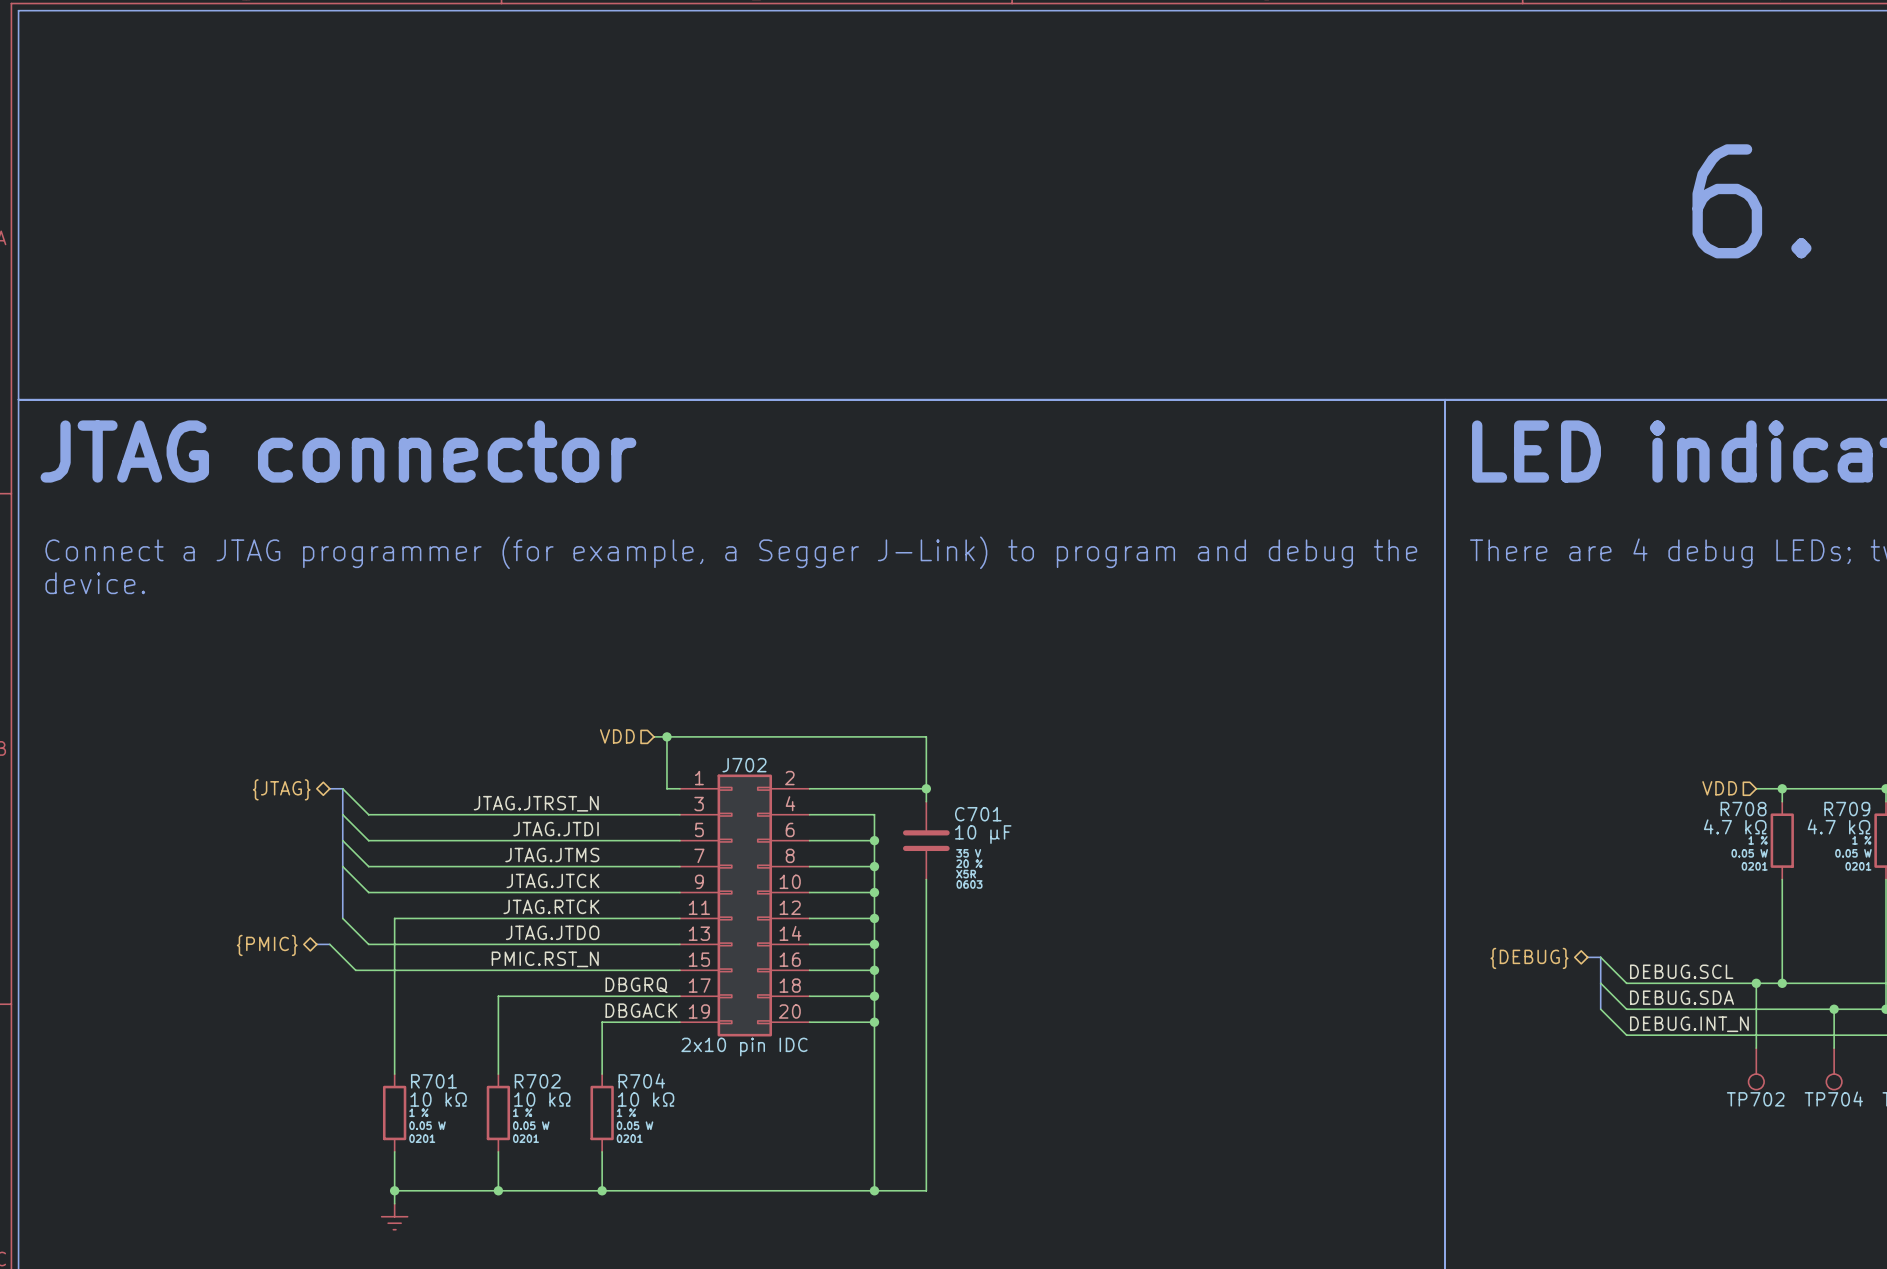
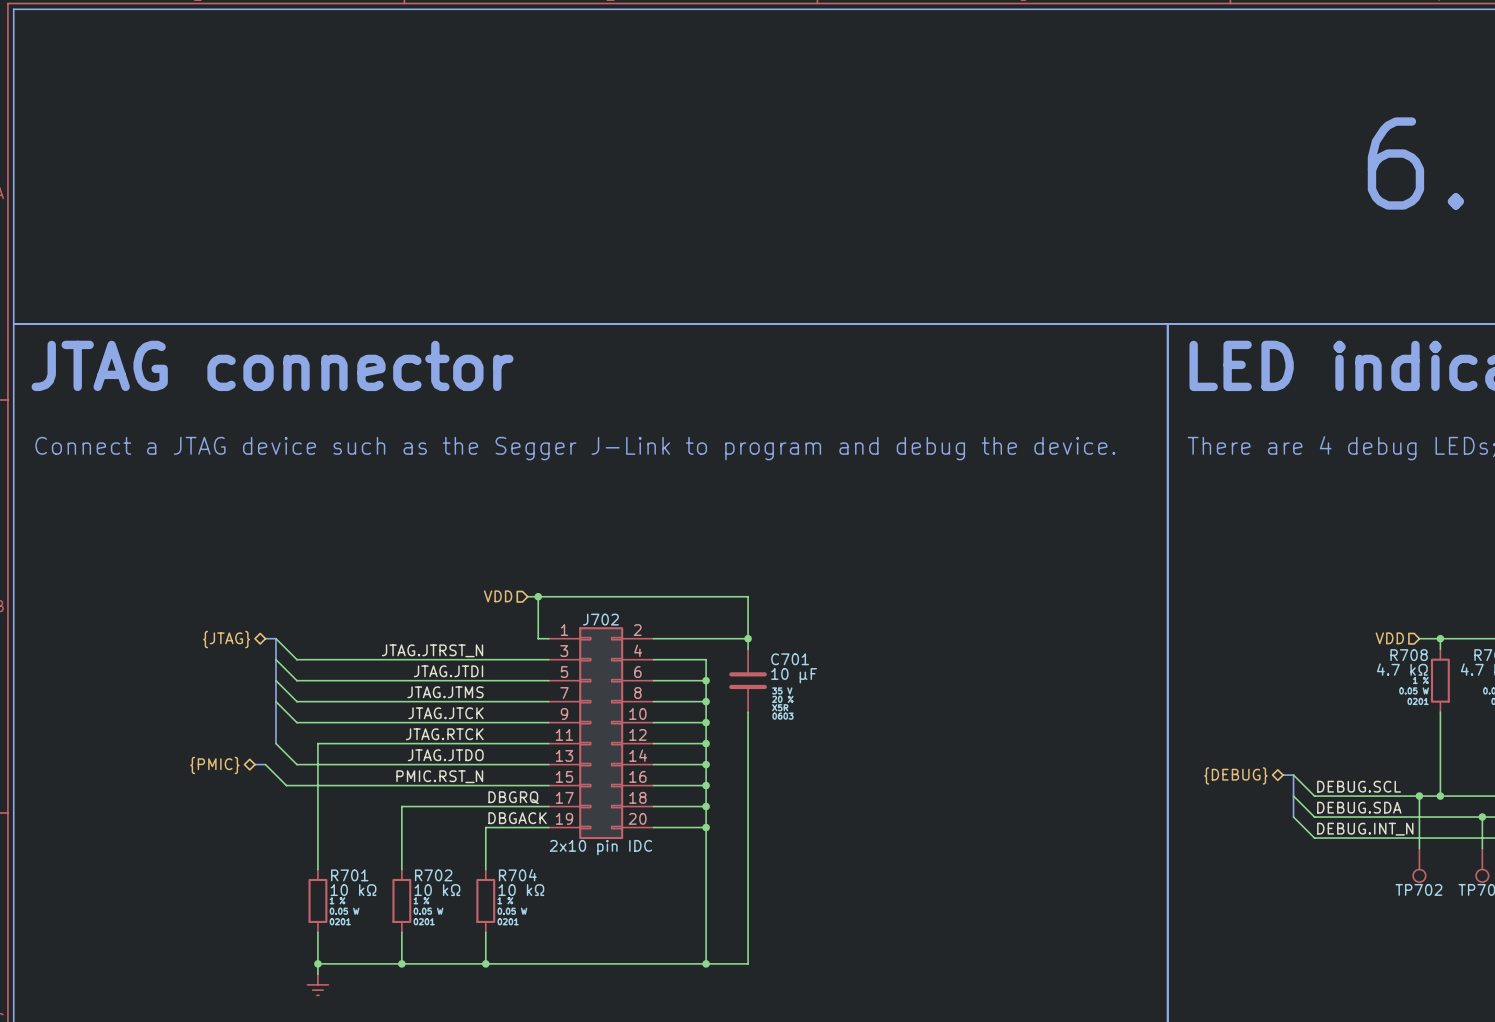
text: Connect a JTAG programmer (for example, a Segger J-Link) to program and debug the (731, 552) -> Connect a JTAG device such as the Segger J-Link to program and debug the device. (575, 448)
text: device. (95, 583) -> none

